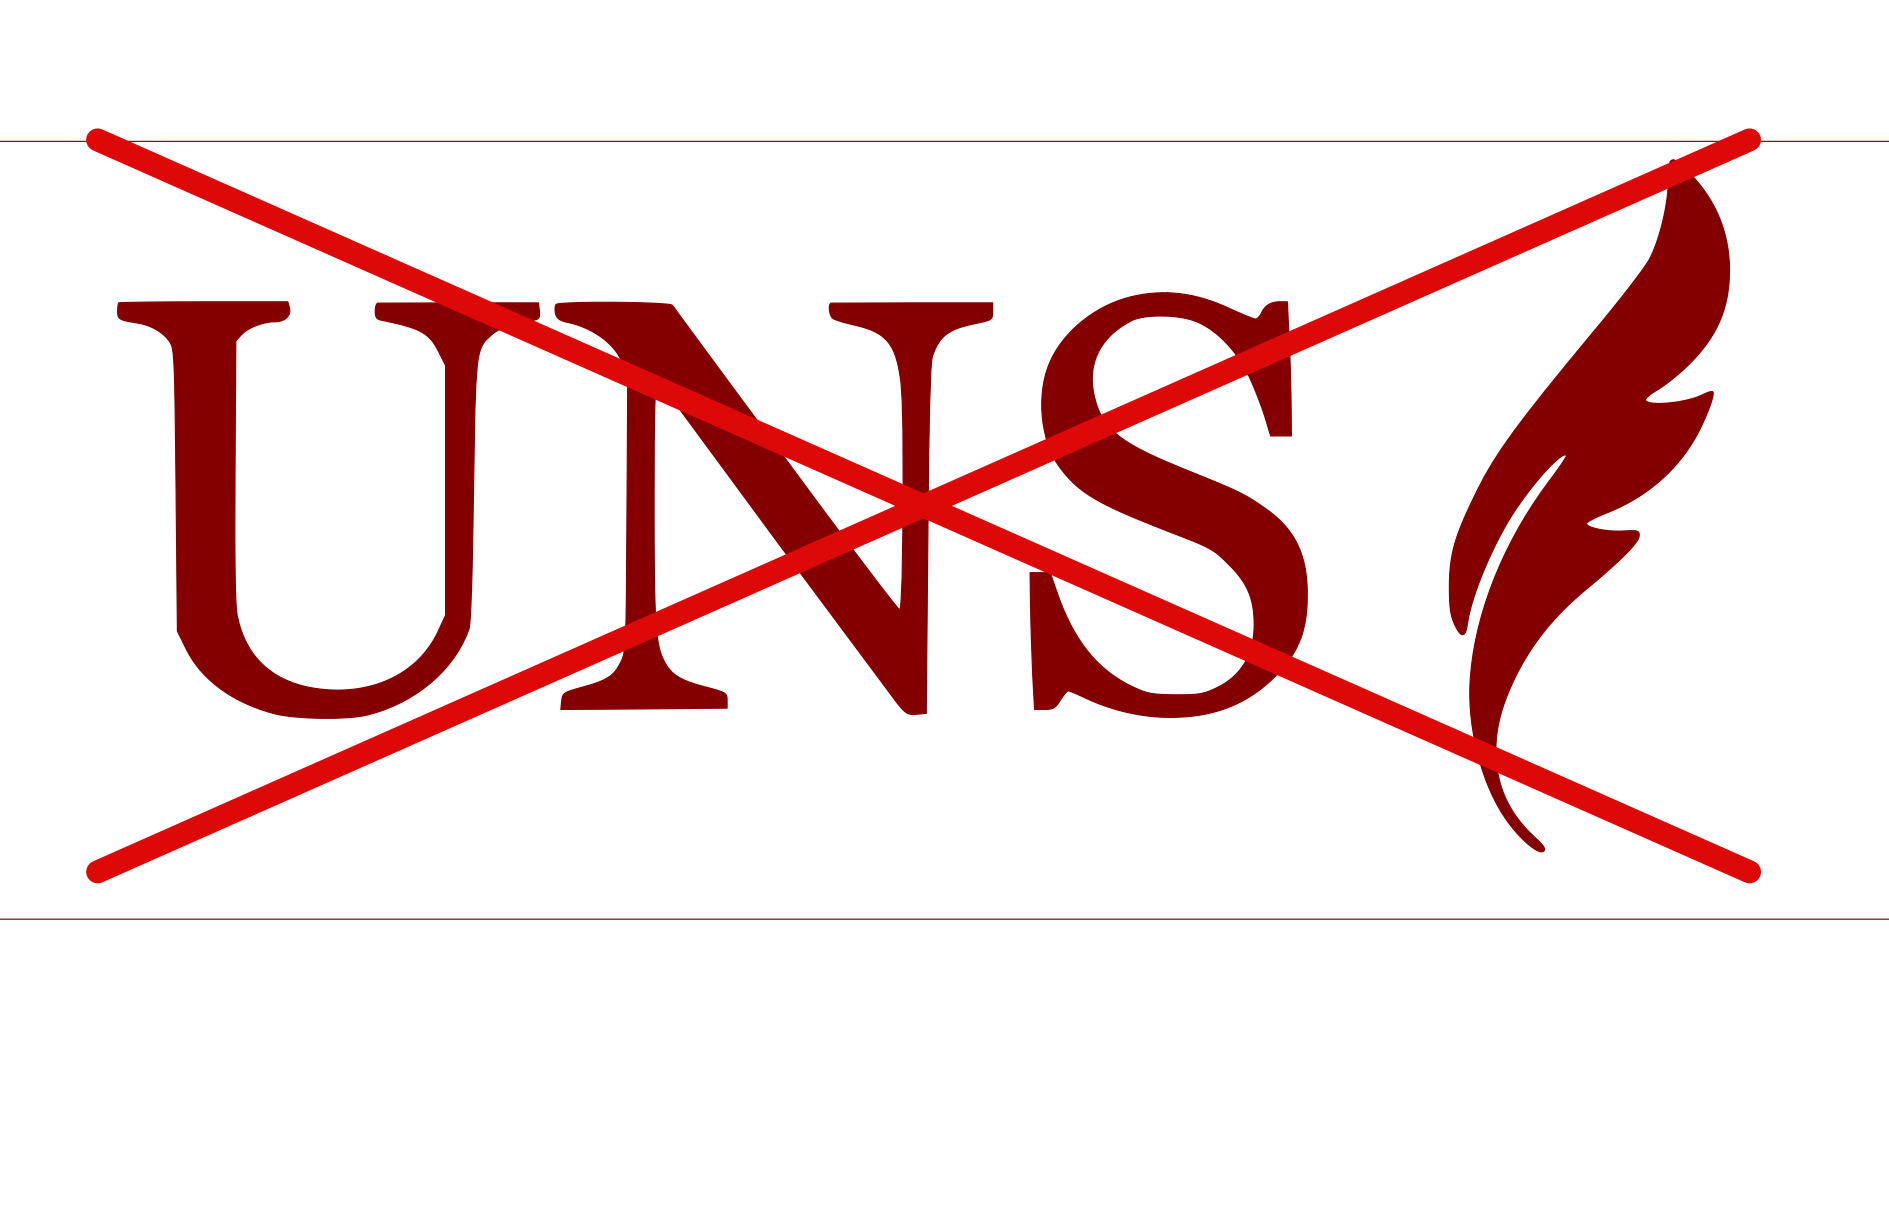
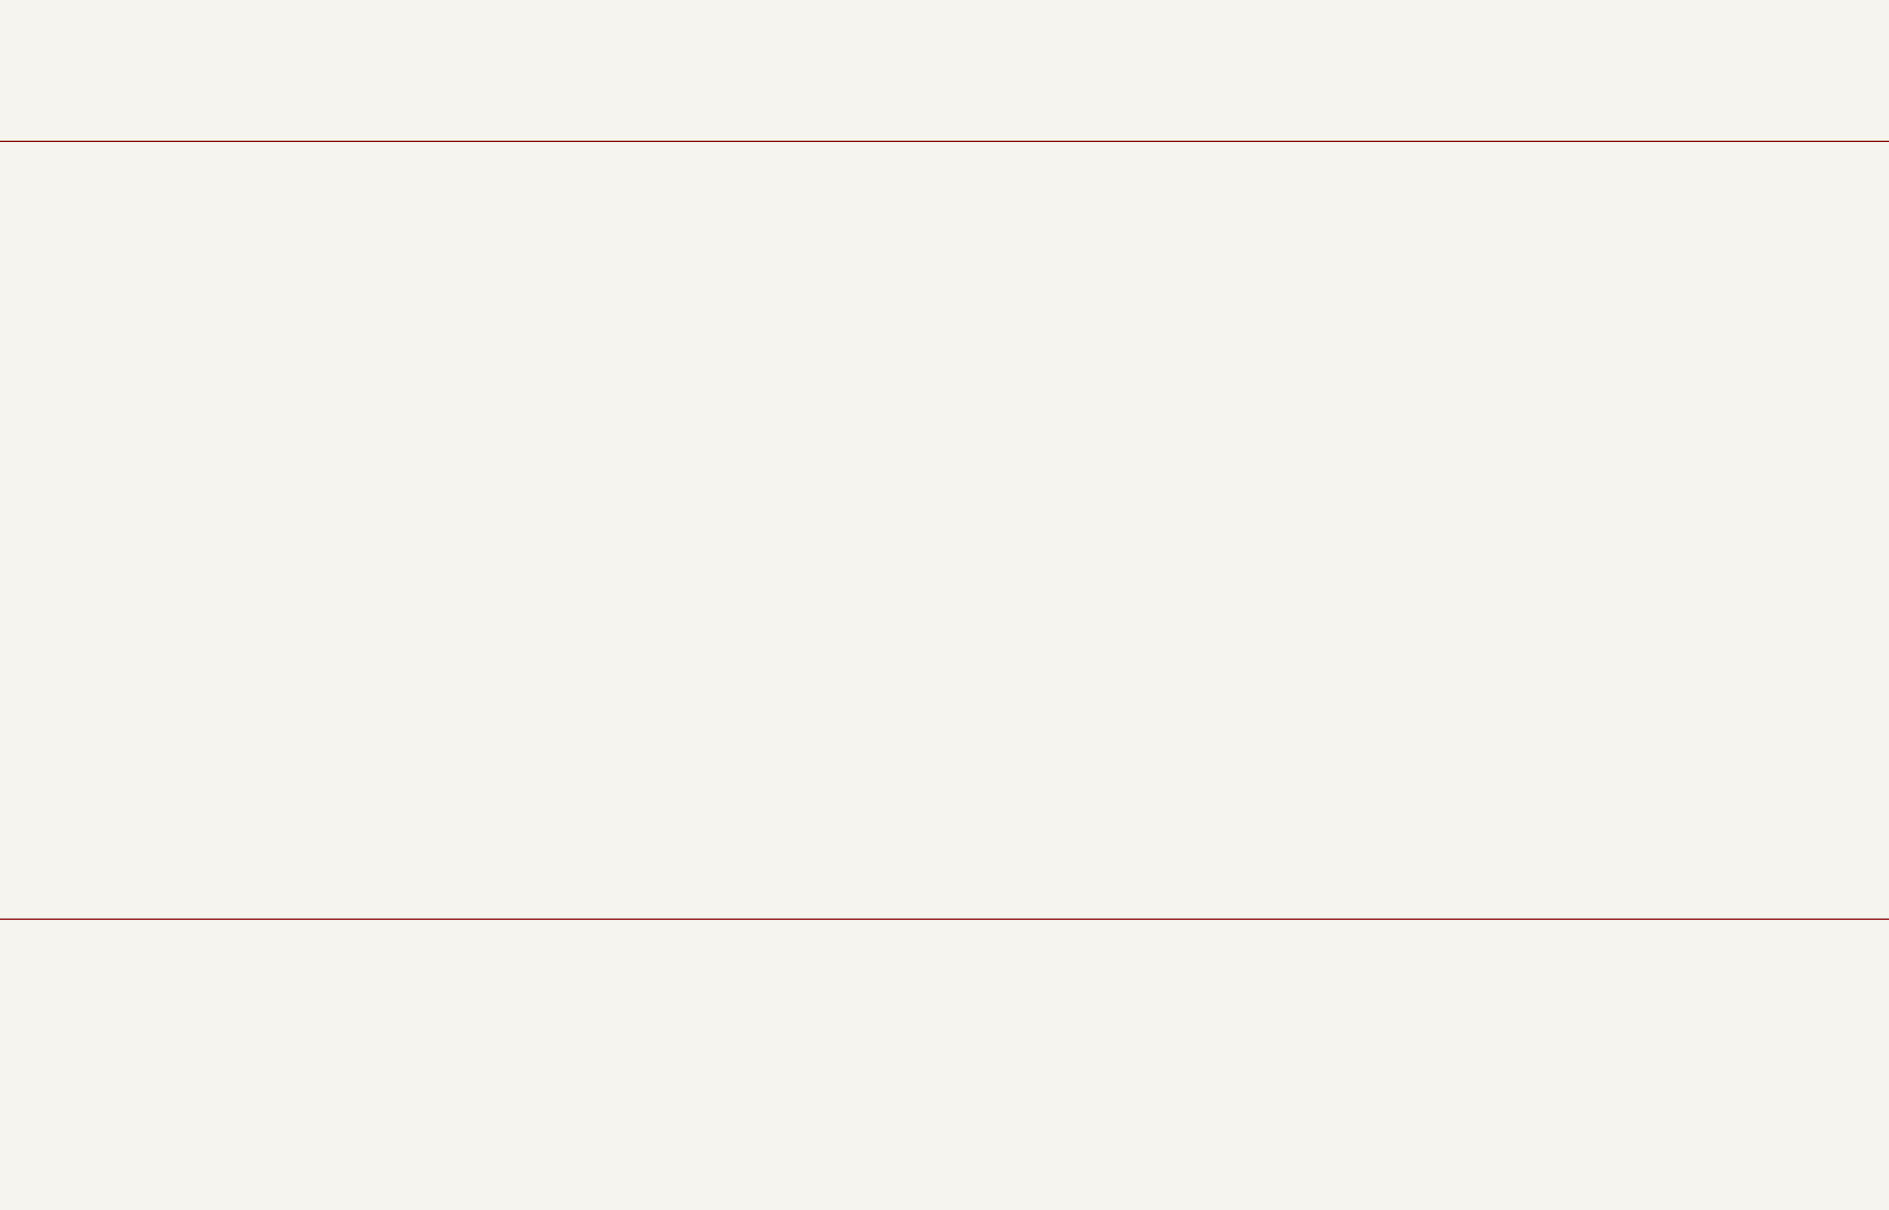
part: (923, 505) -> none

